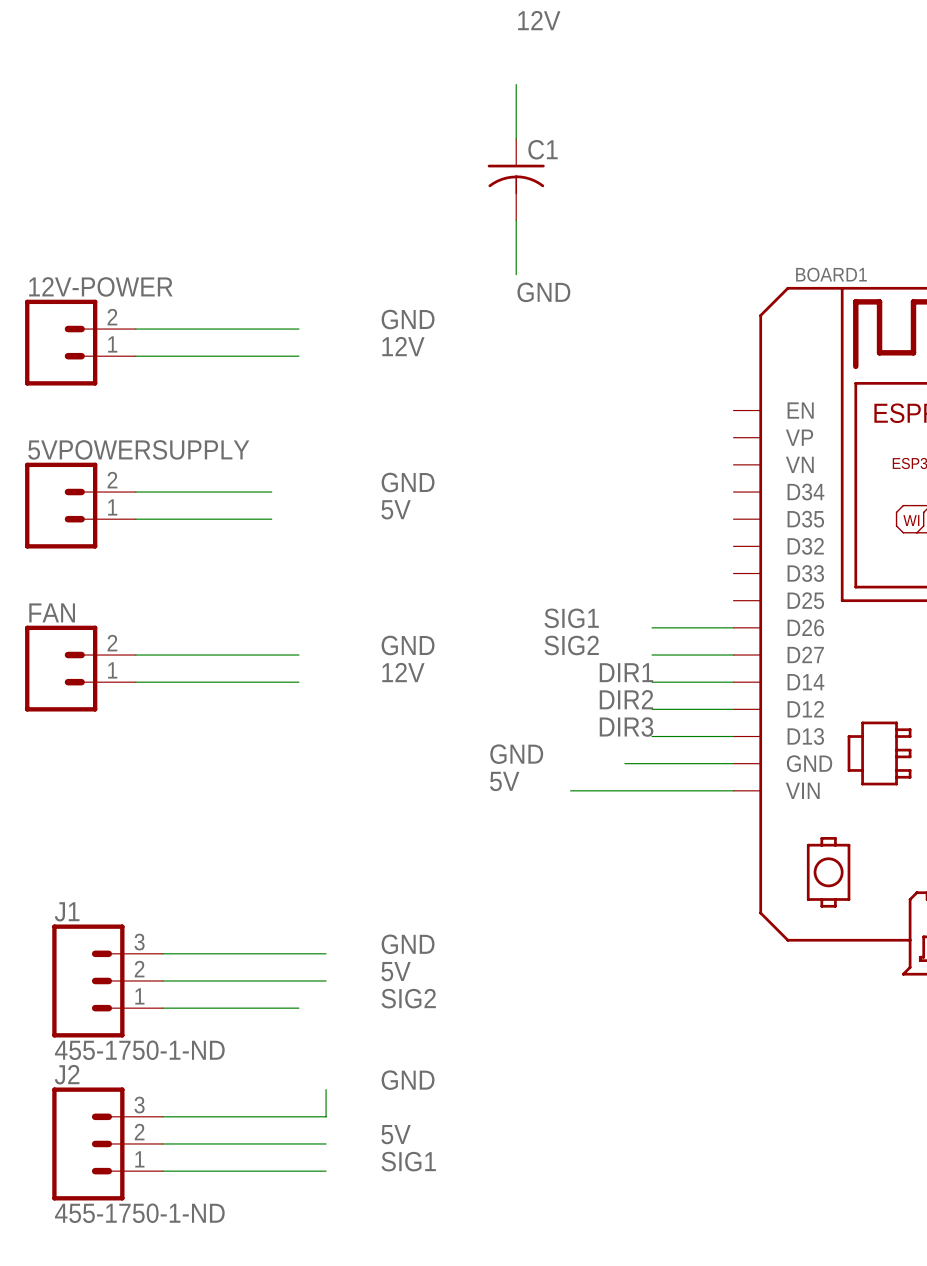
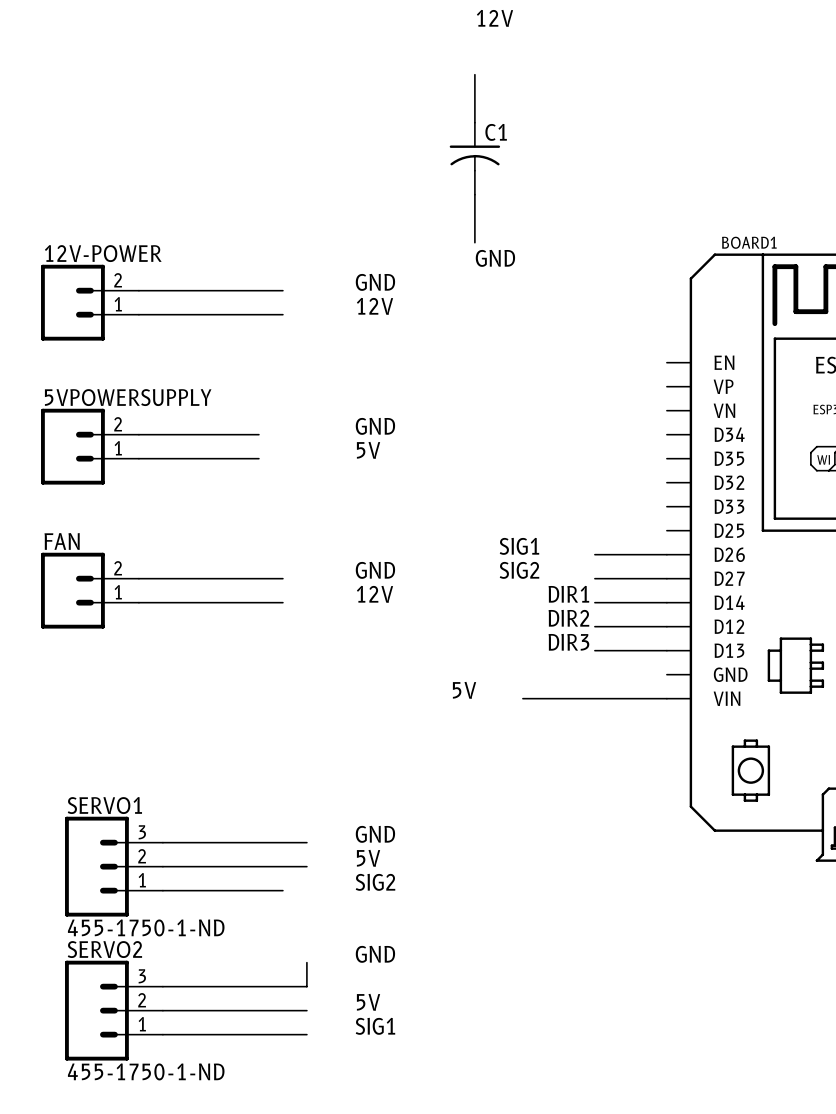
label: GND (516, 754) -> none
wire: (624, 763) (733, 763) -> none
J1 name: J1 (67, 911) -> SERVO1 (104, 805)
J2 name: J2 (67, 1074) -> SERVO2 (104, 949)

